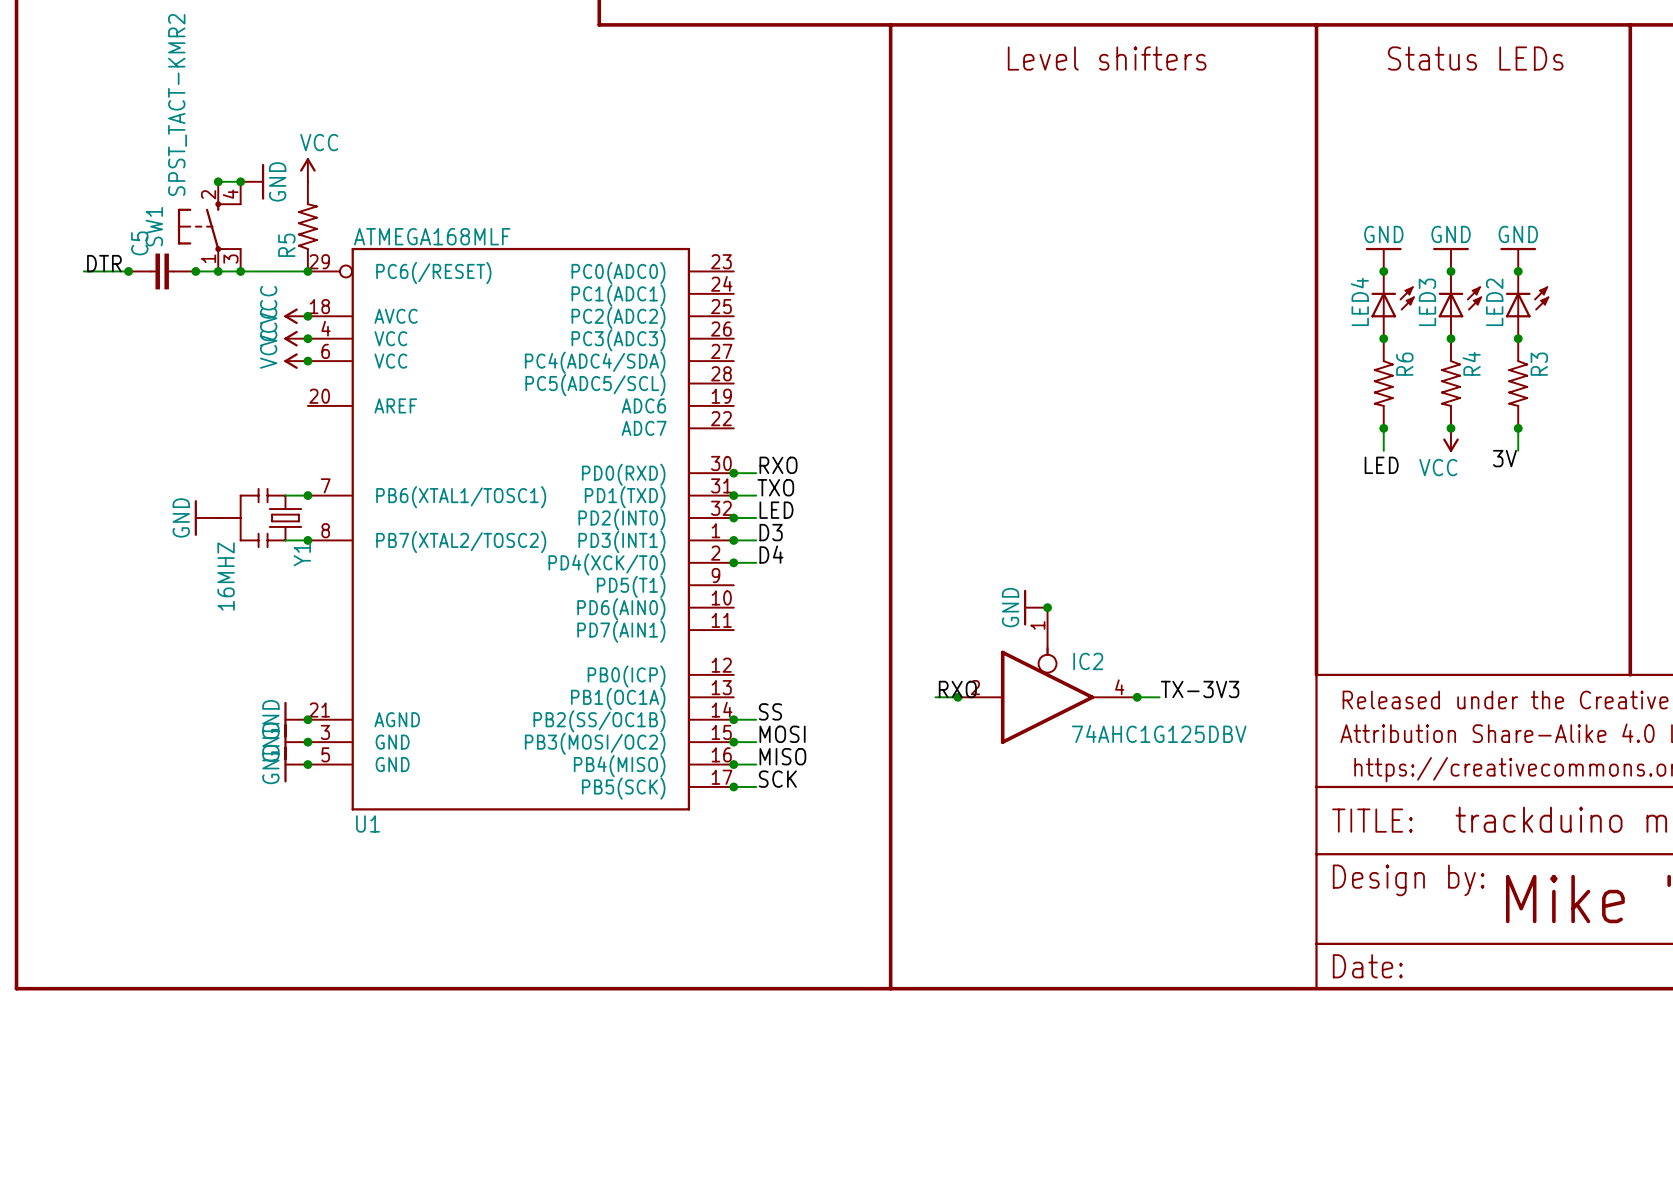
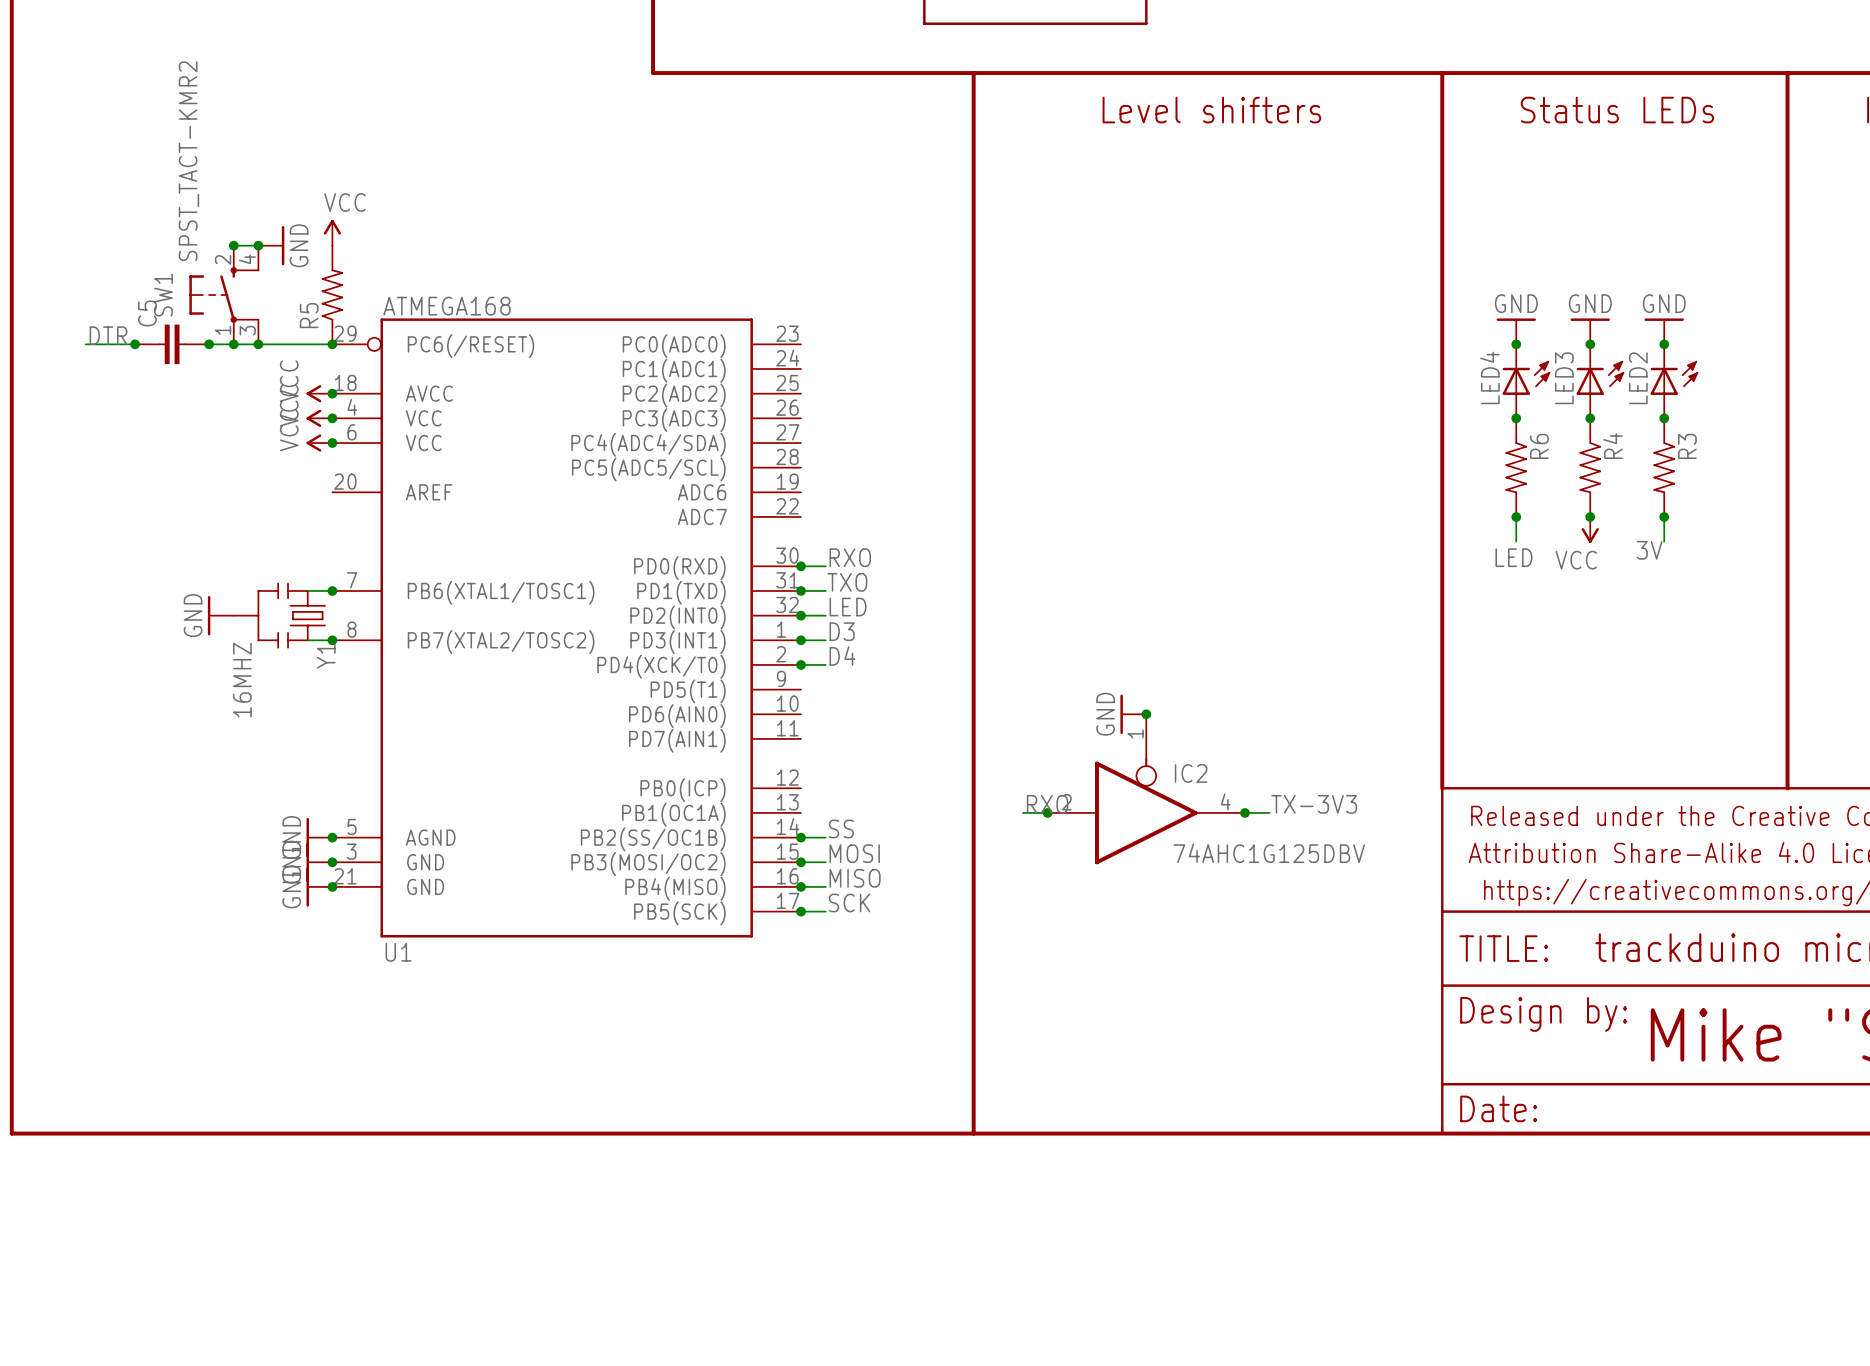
U1 value: ATMEGA168MLF (432, 236) -> ATMEGA168 (447, 306)
U1 pin number: 21 (319, 710) -> 5 (352, 826)
U1 pin number: 5 (325, 754) -> 21 (345, 876)

